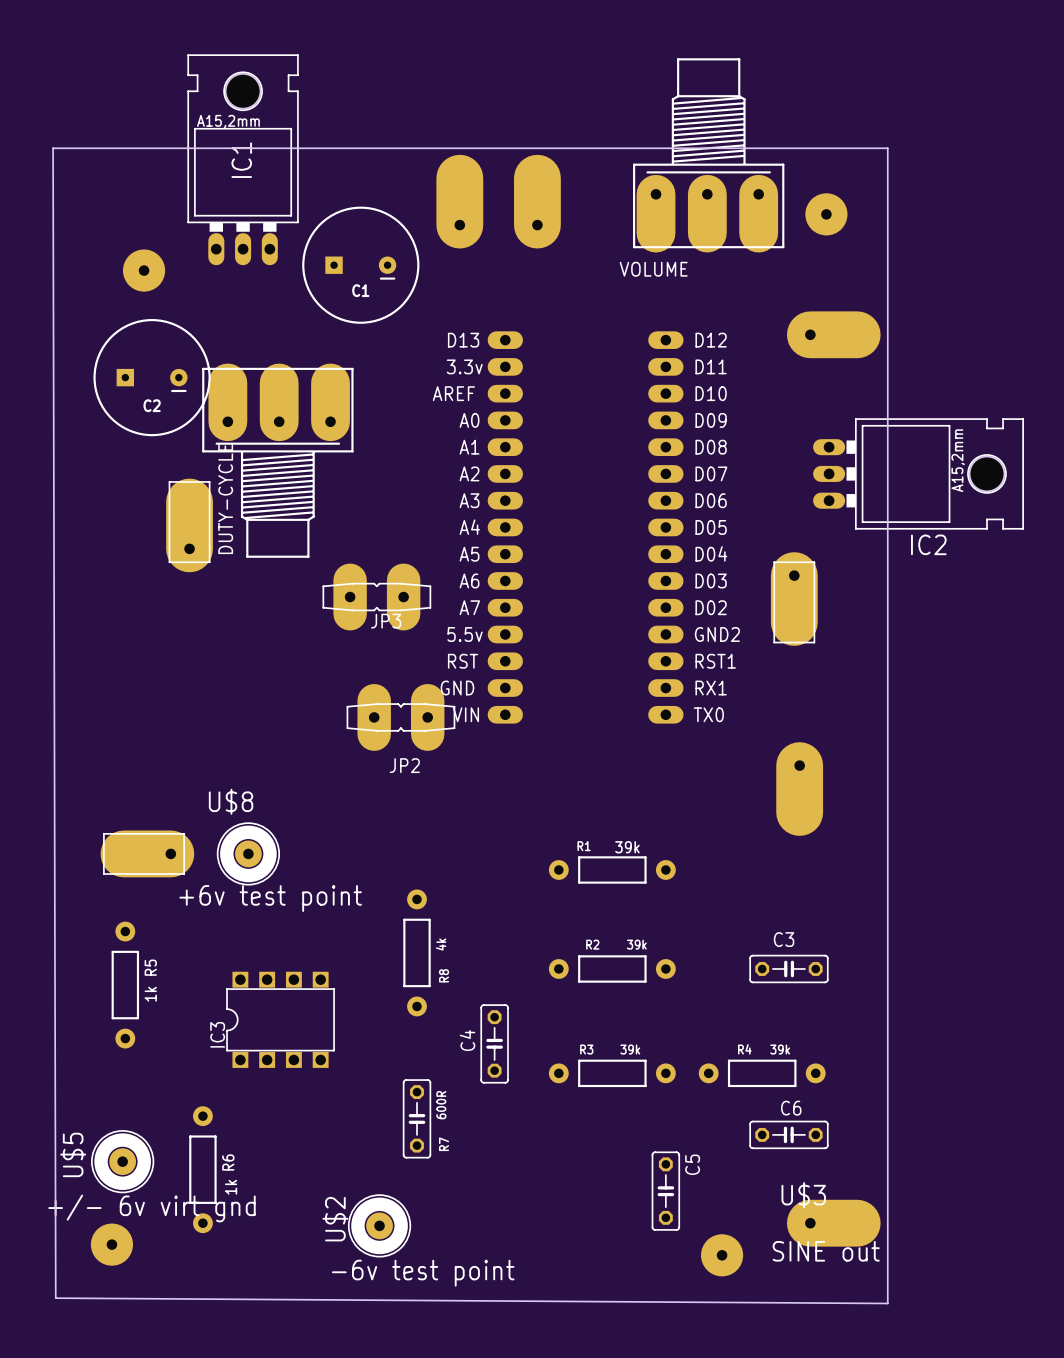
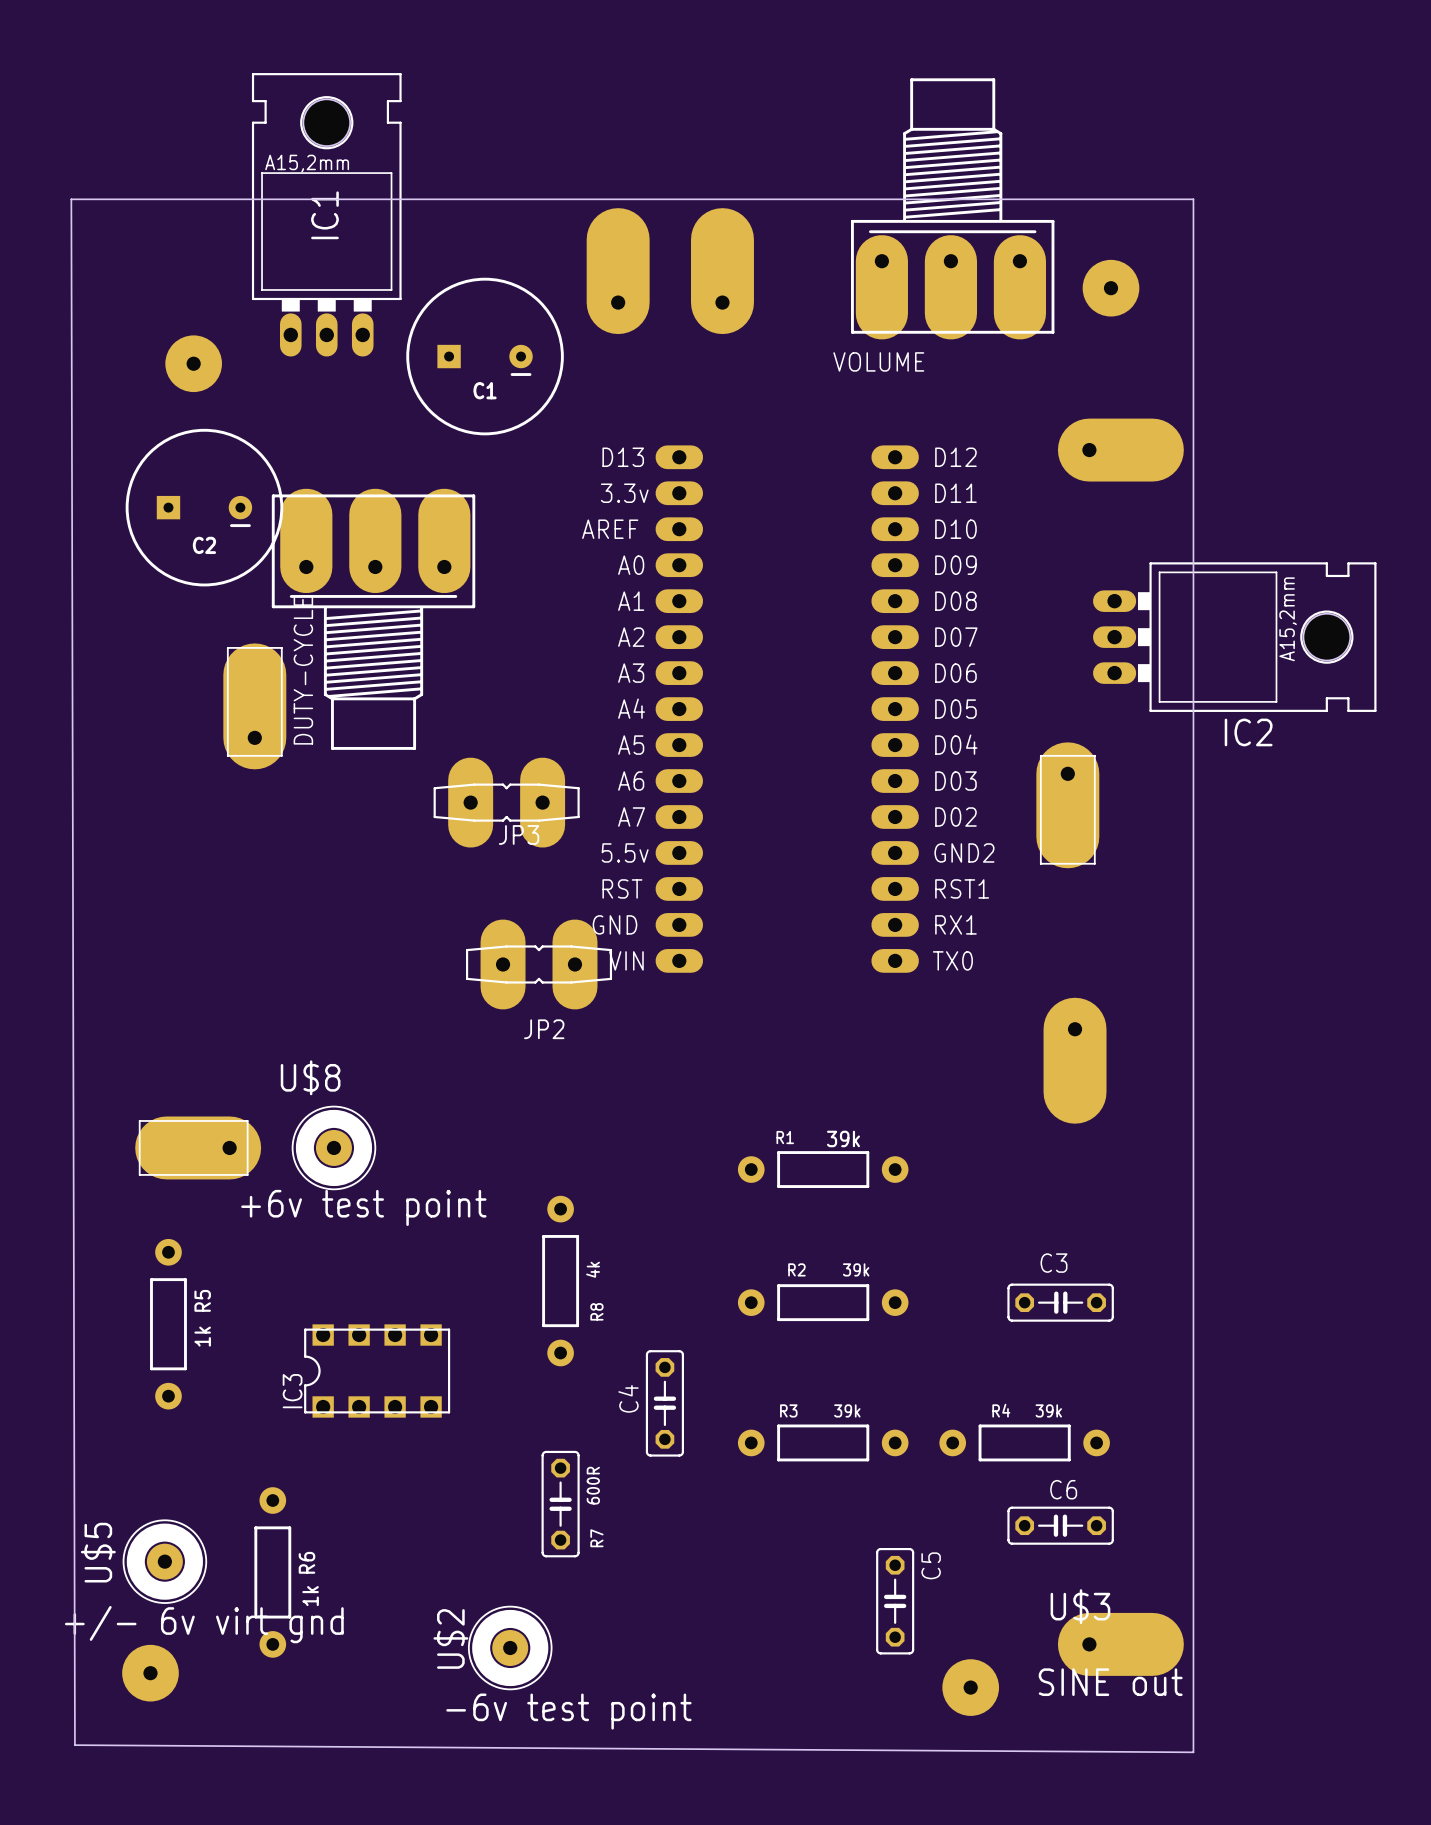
IC3 footprint: [226, 971, 335, 1068] -> [304, 1324, 451, 1418]

